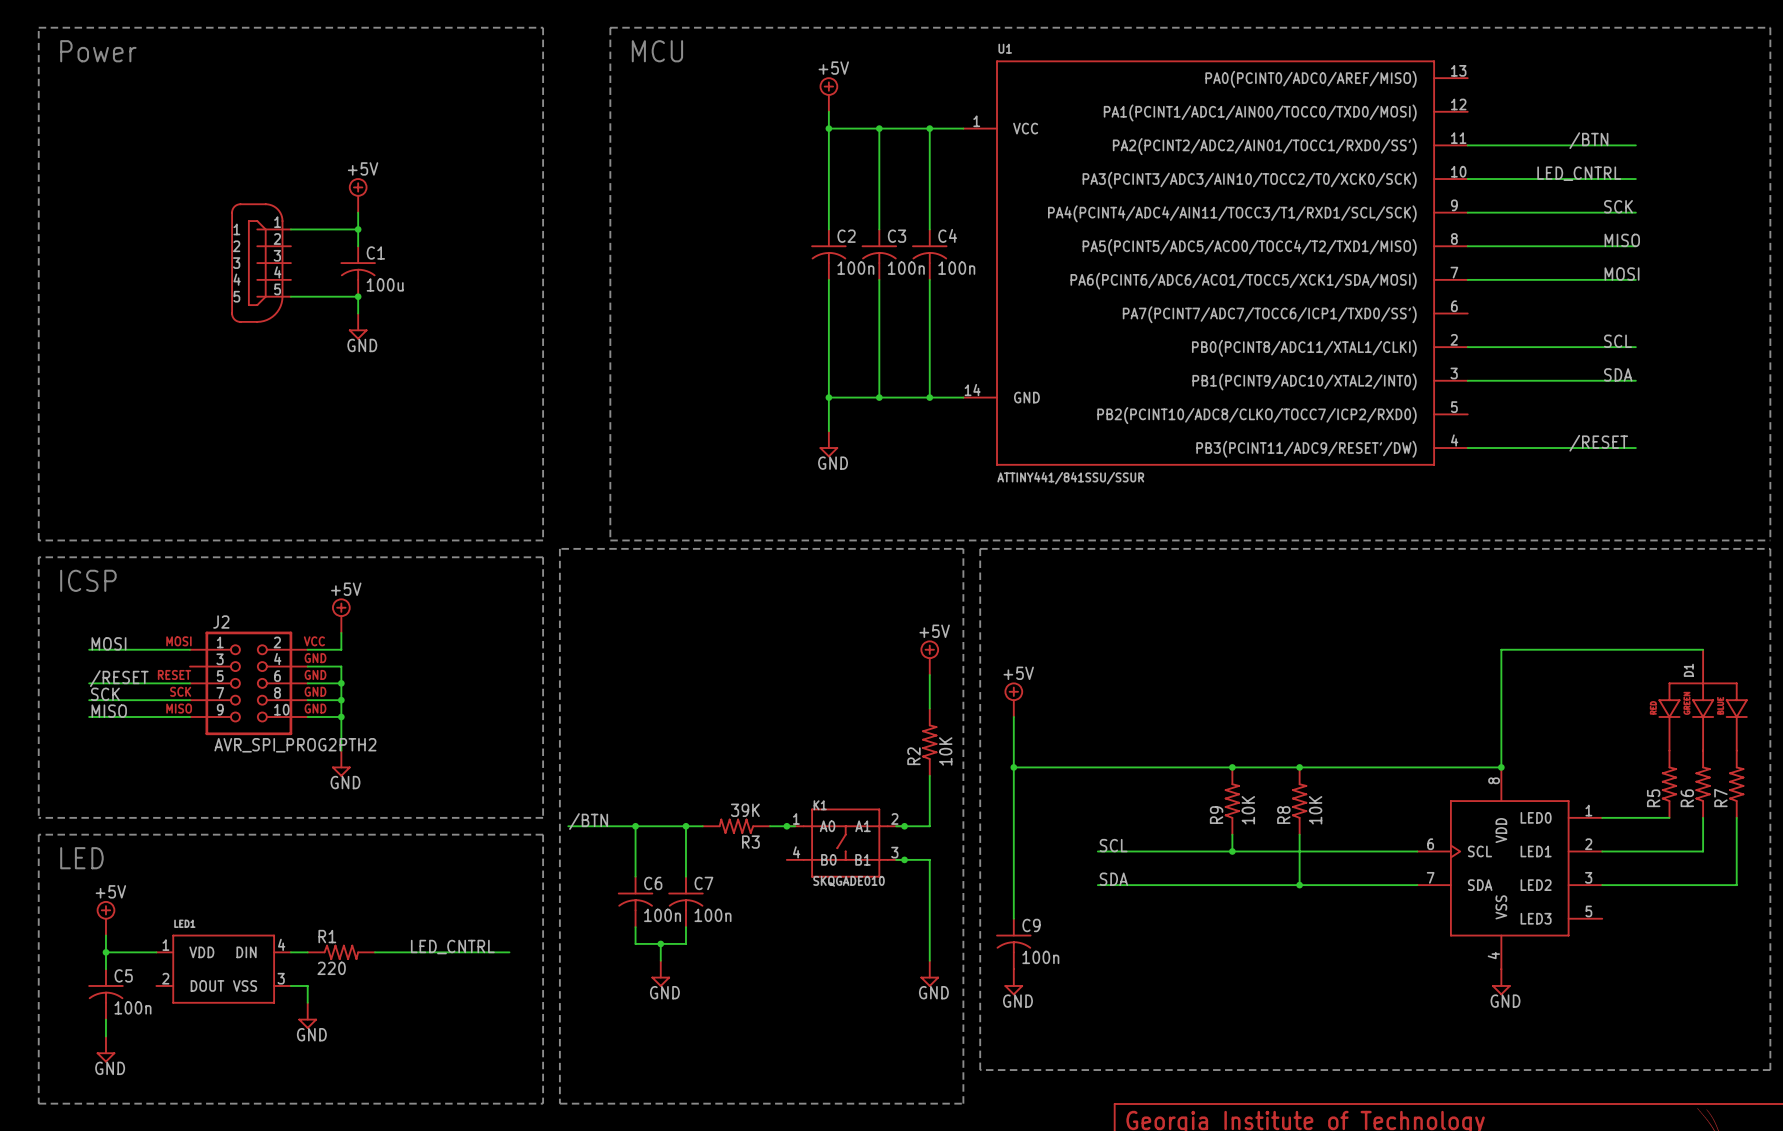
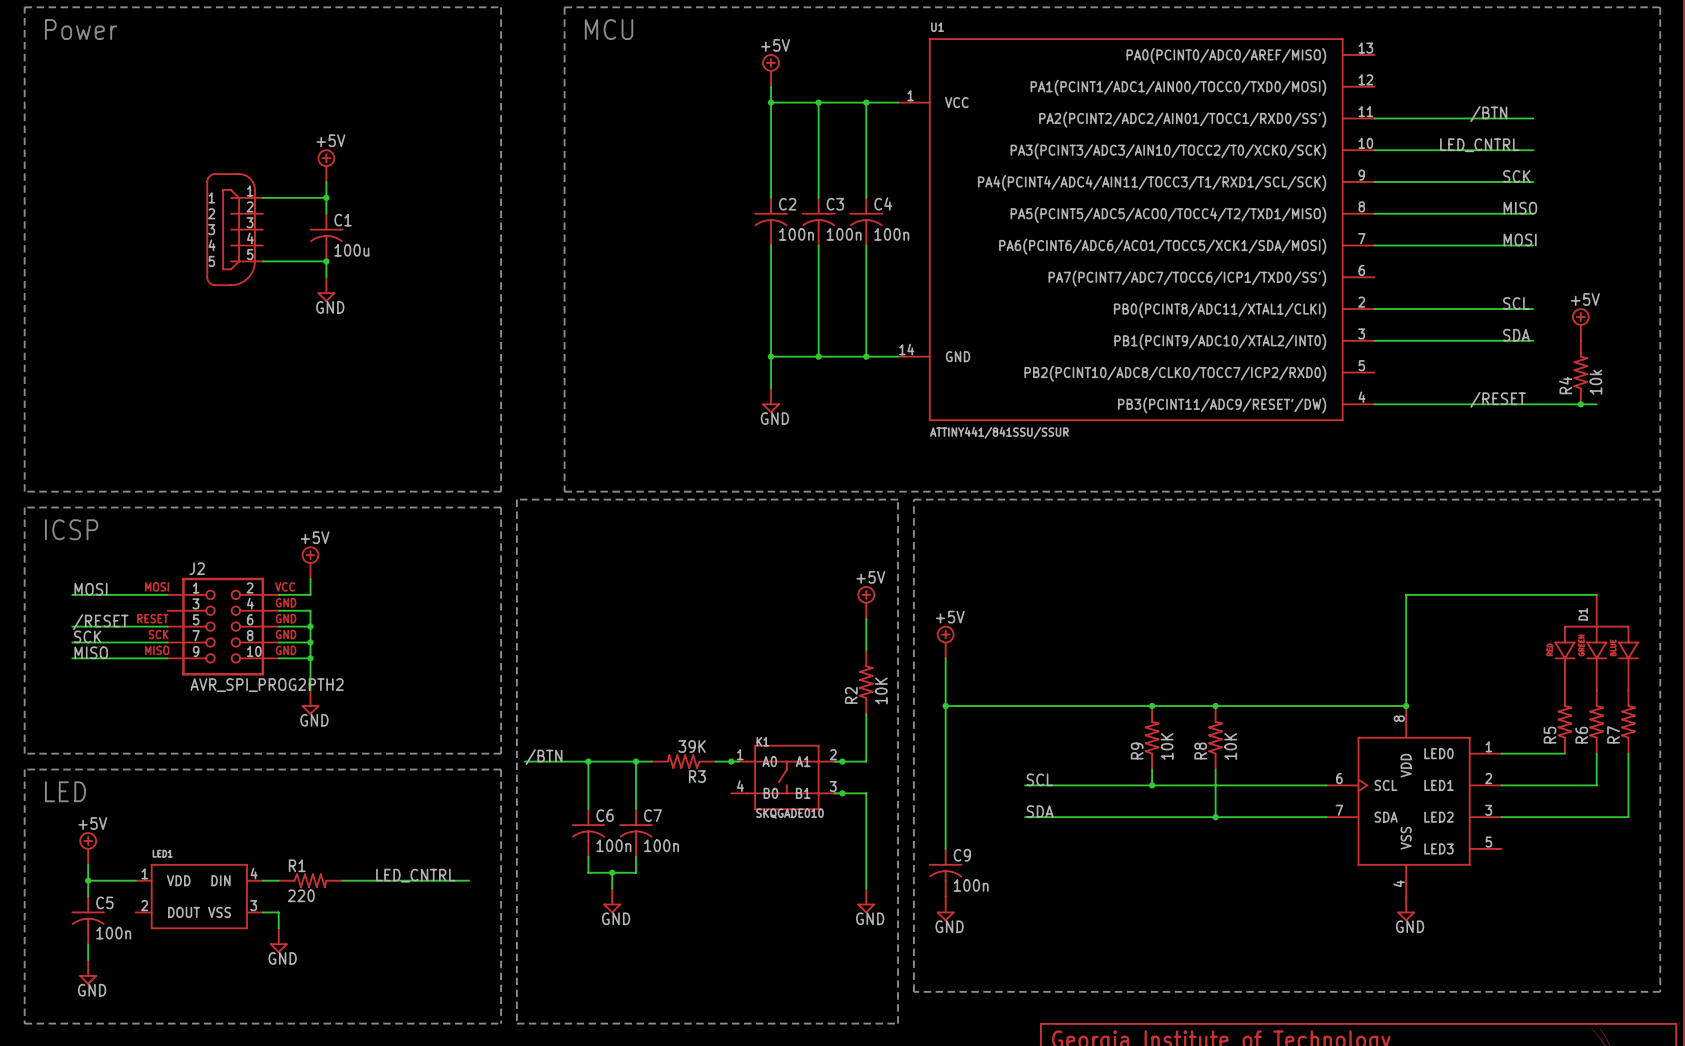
power symbol: none -> +5V (1580, 324)
R4: none -> 10k (1580, 372)
wire: none -> (1533, 404) (1596, 404)
junction: none -> (1580, 404)

